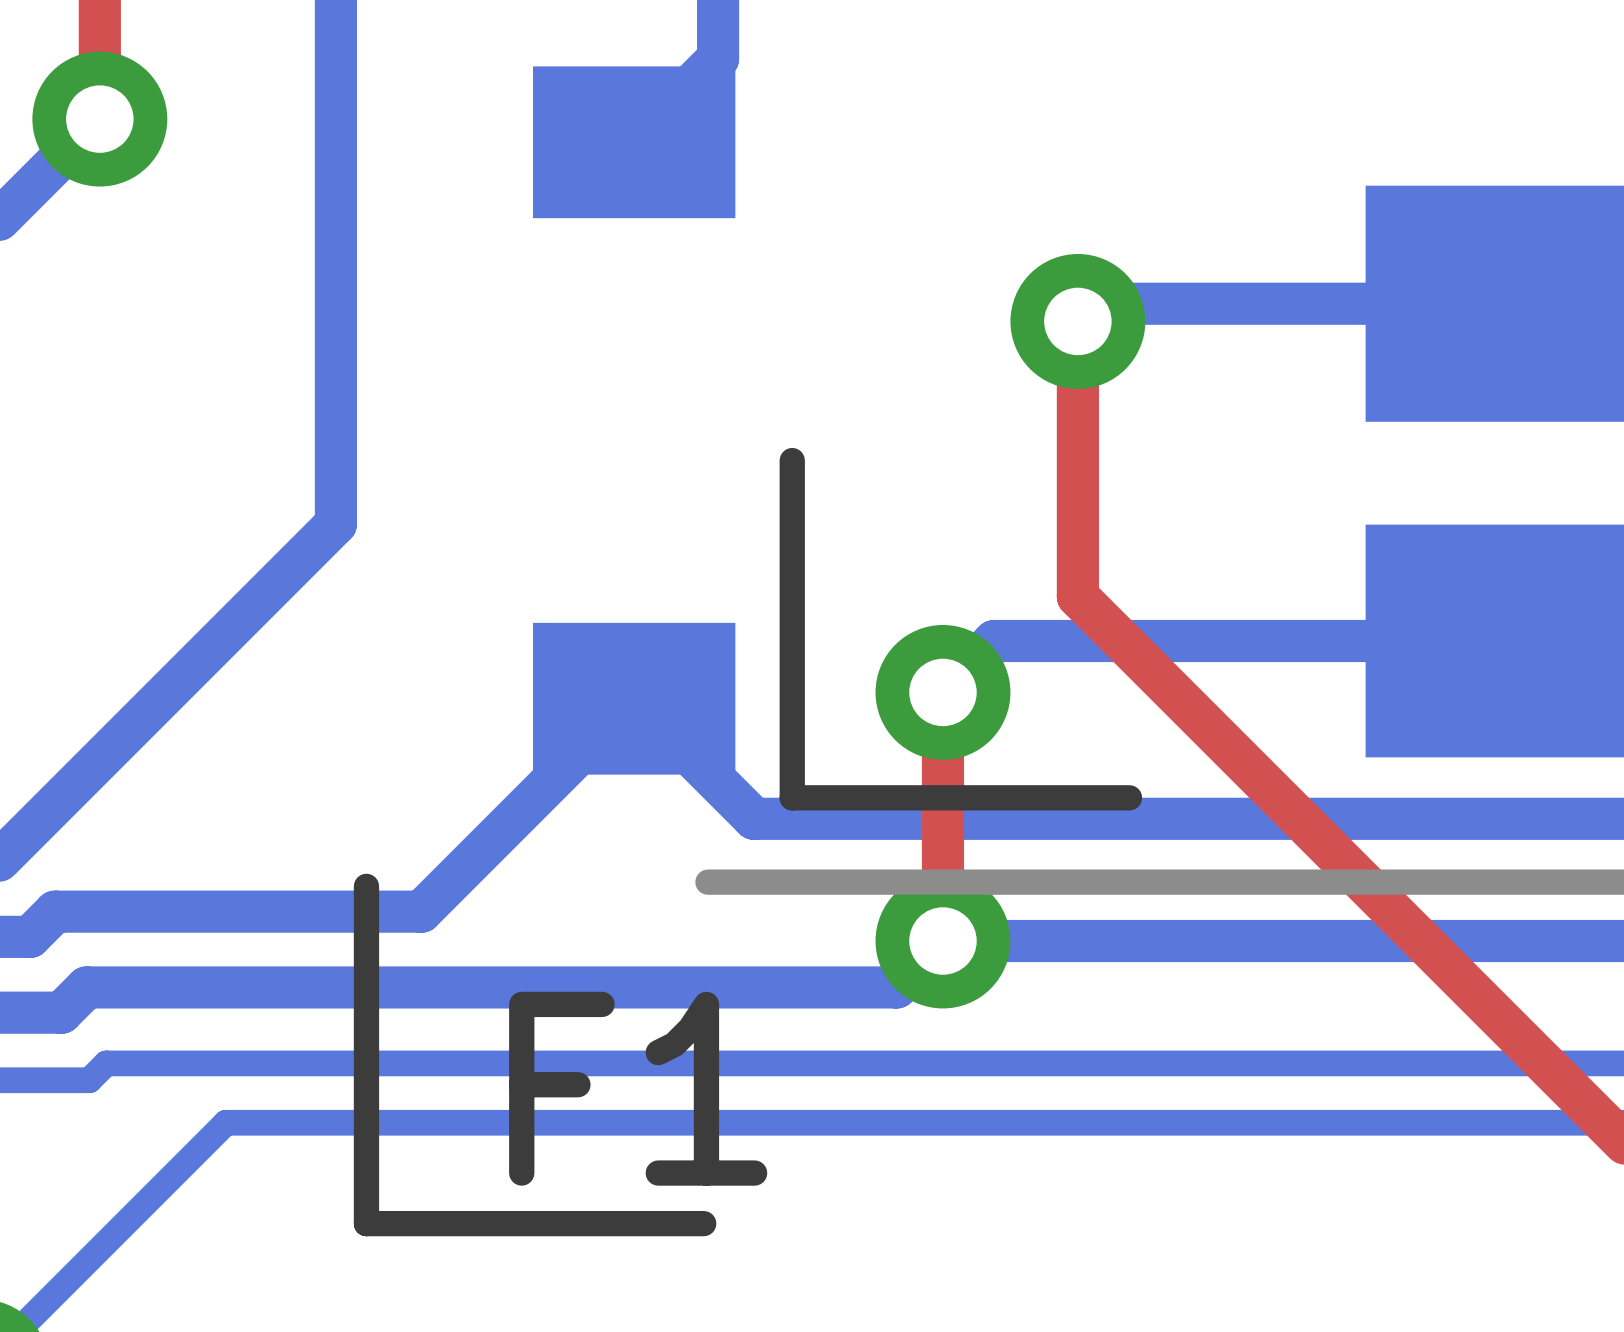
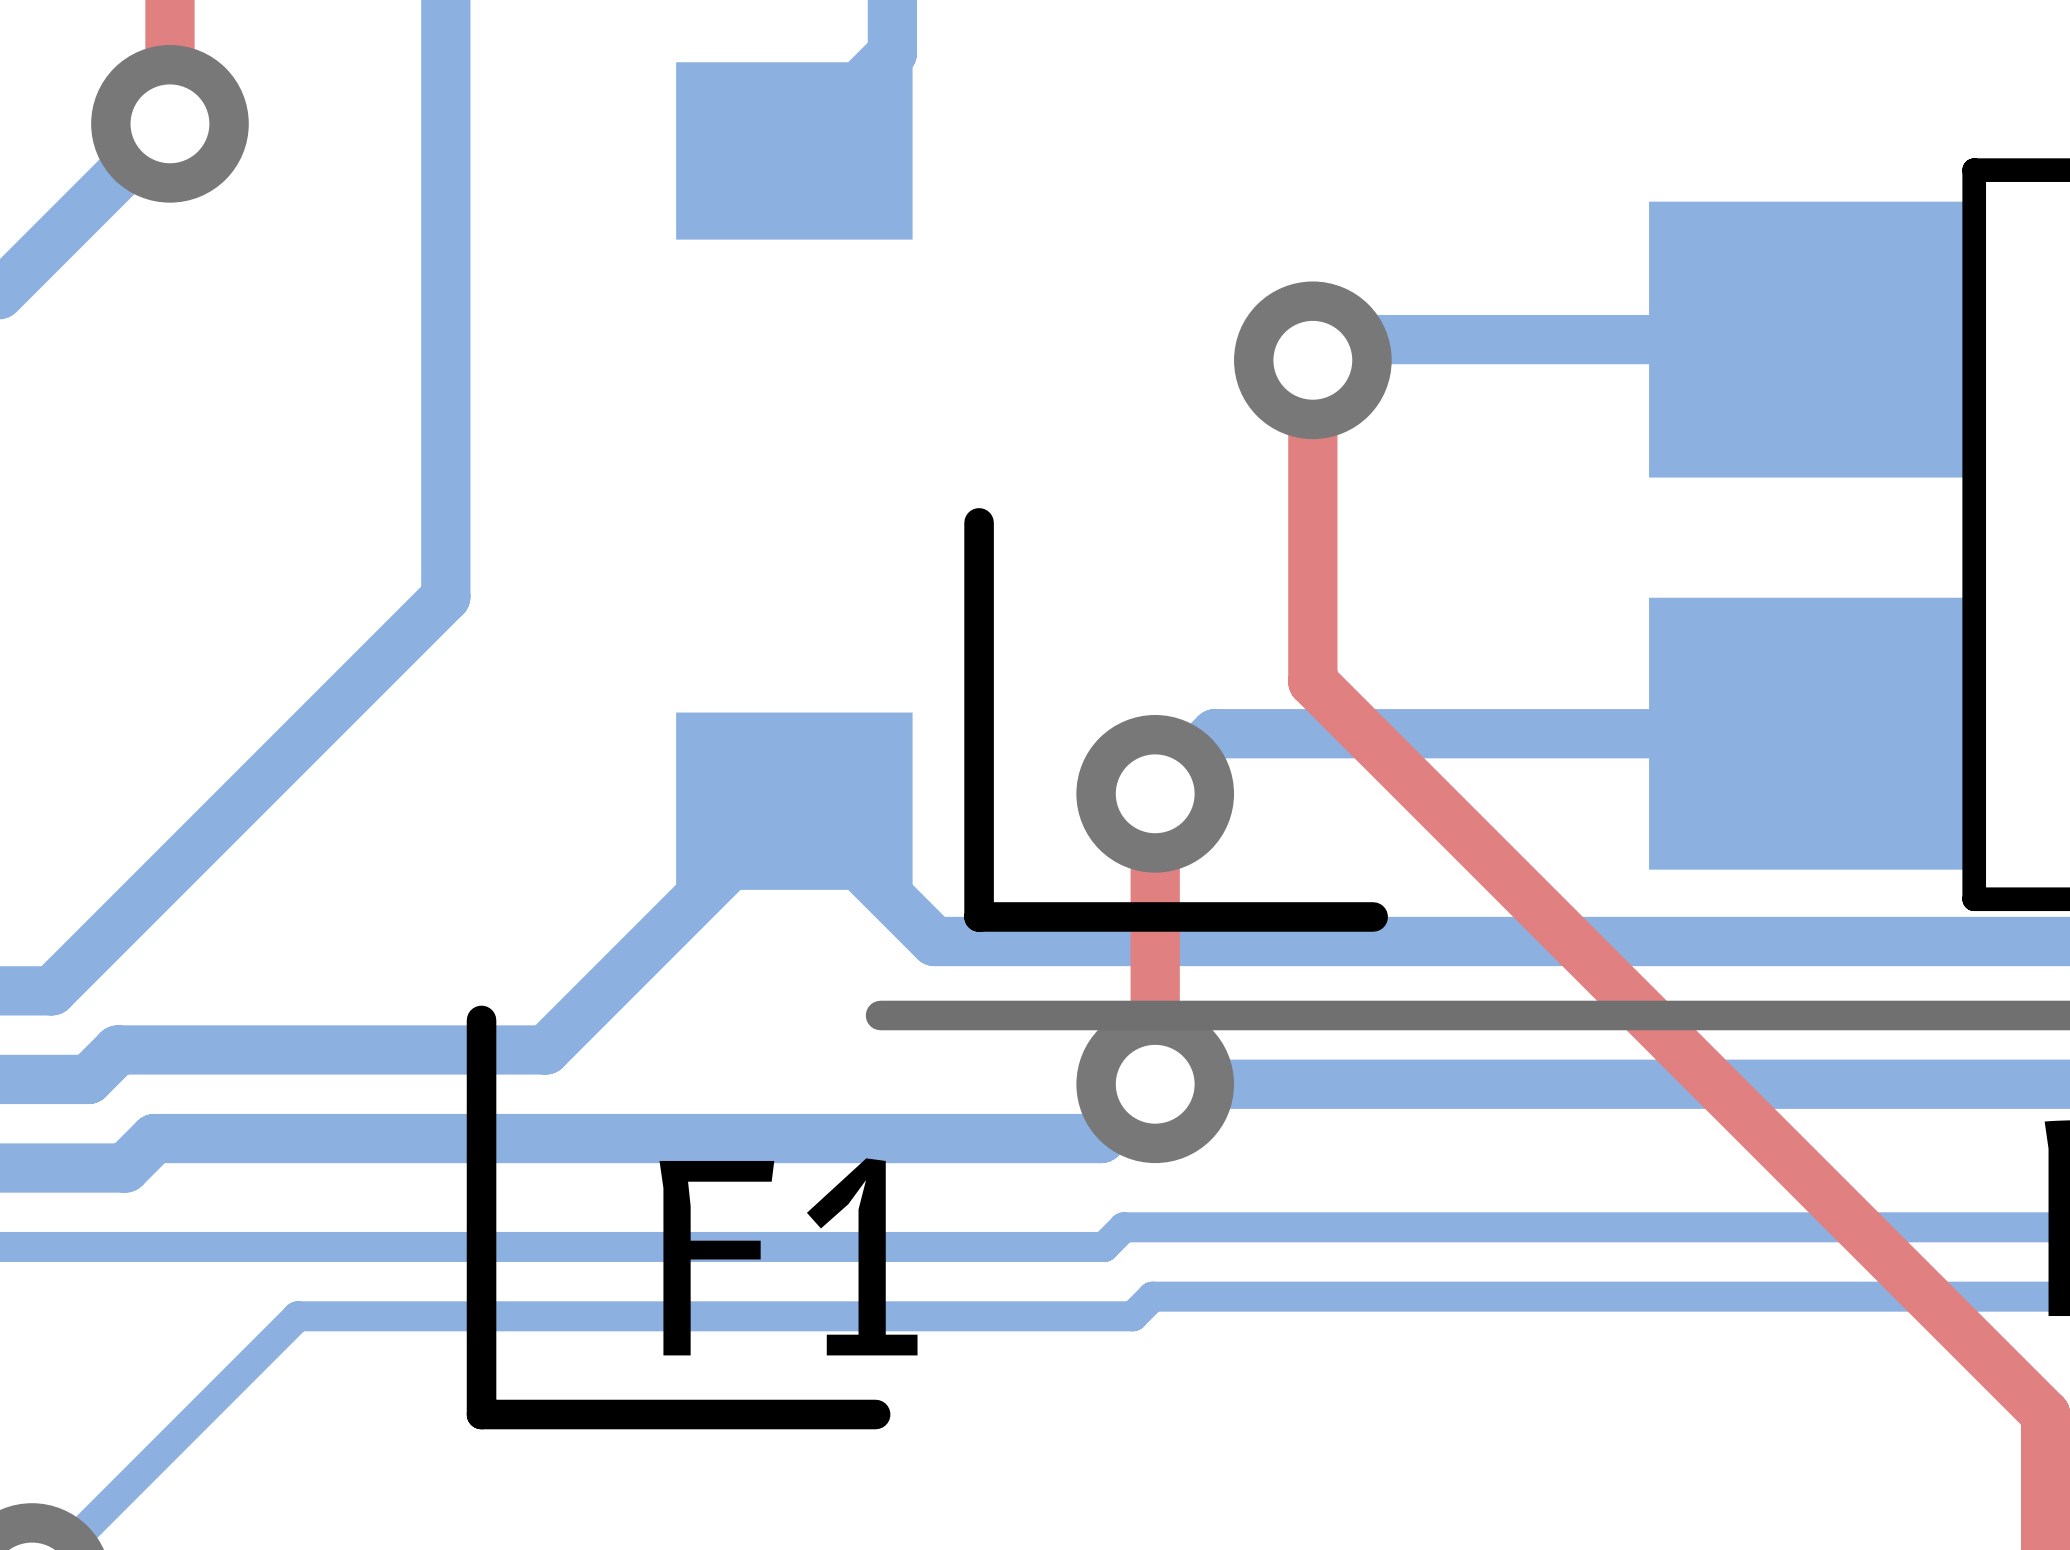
bottom track: (916, 1063) (106, 1063) (89, 1080) -> (1123, 1227) (1104, 1246) (157, 1246)
bottom track: (940, 1122) (225, 1122) (209, 1139) -> (1152, 1296) (1132, 1316) (297, 1316)

